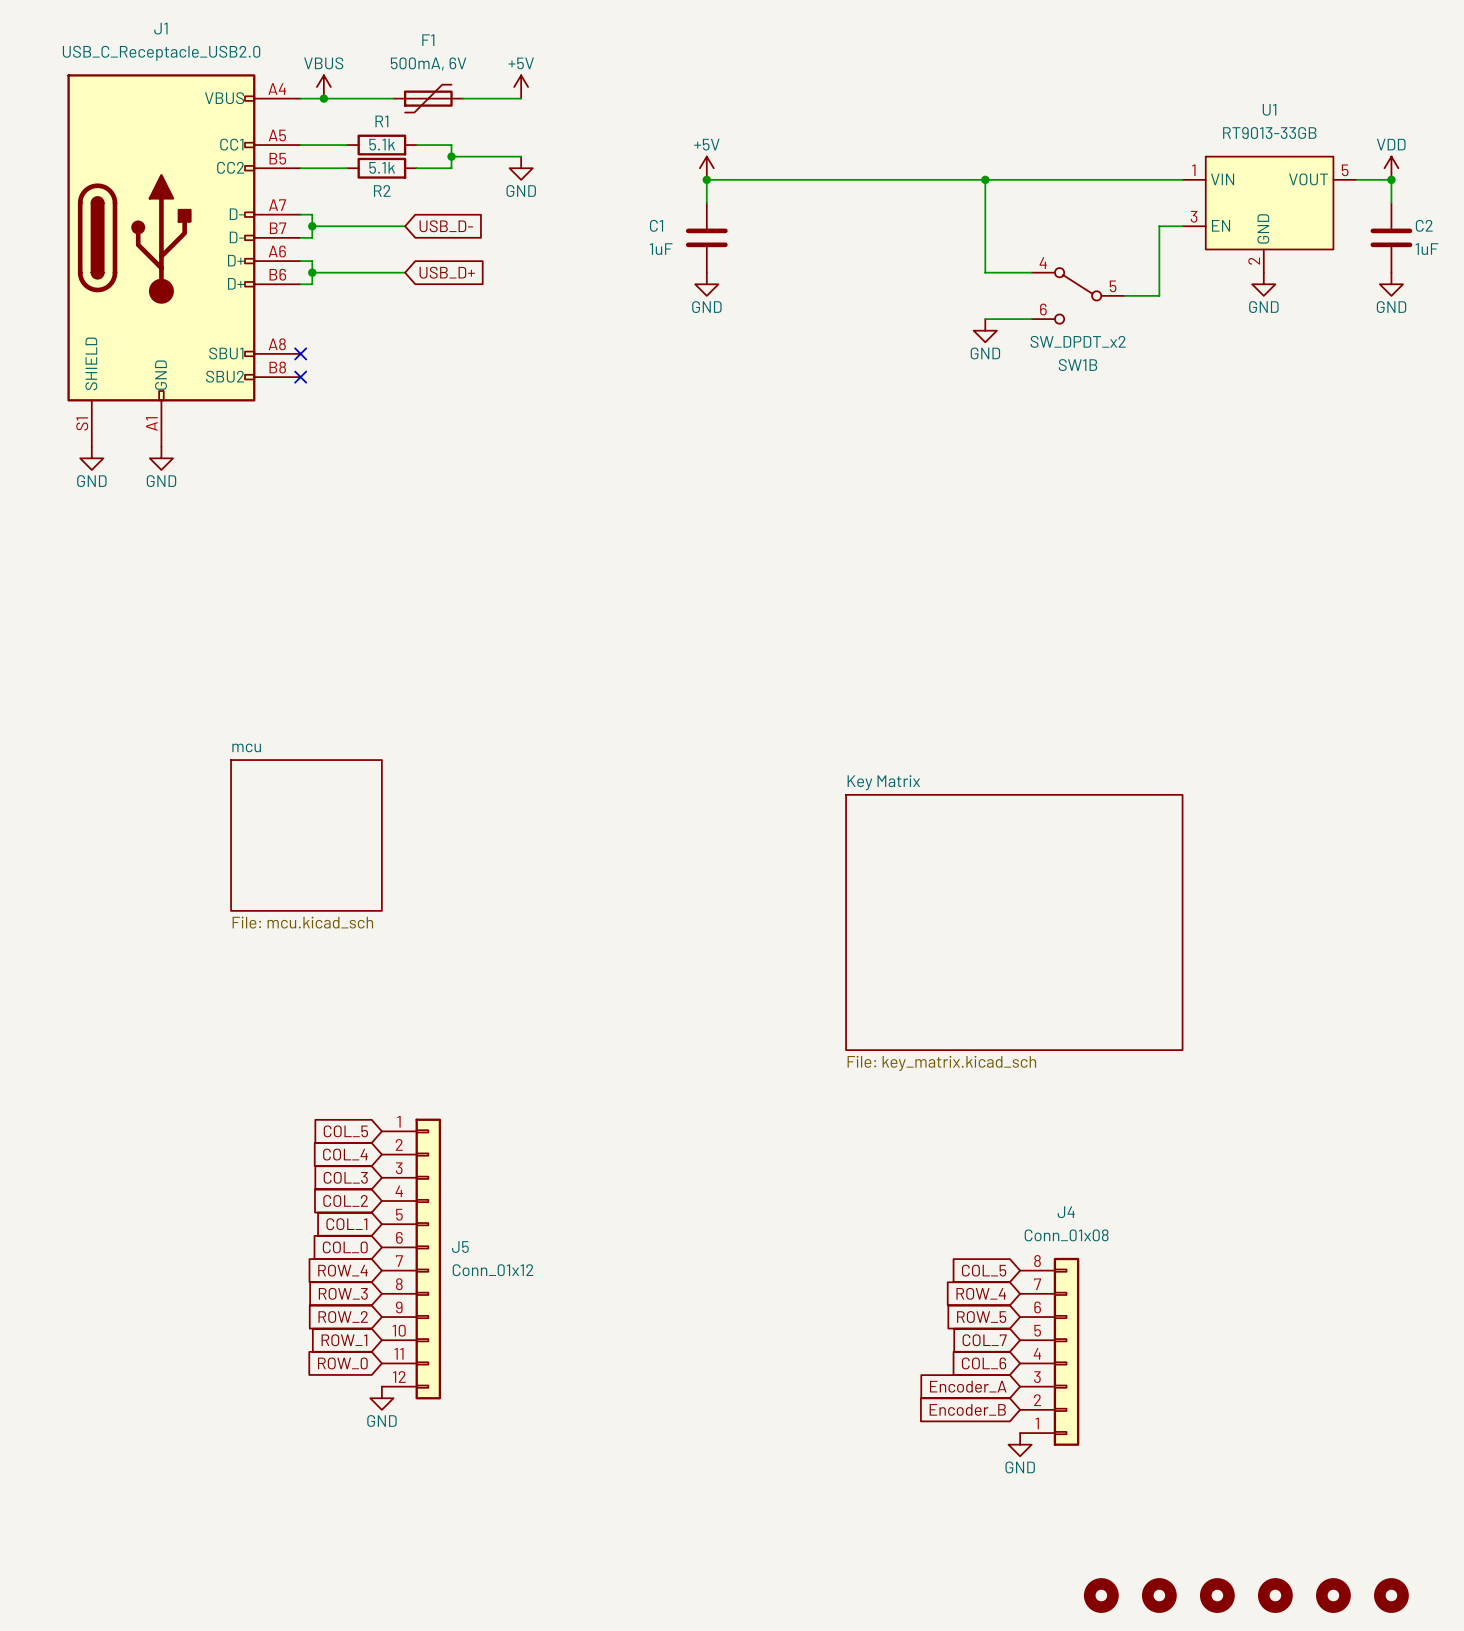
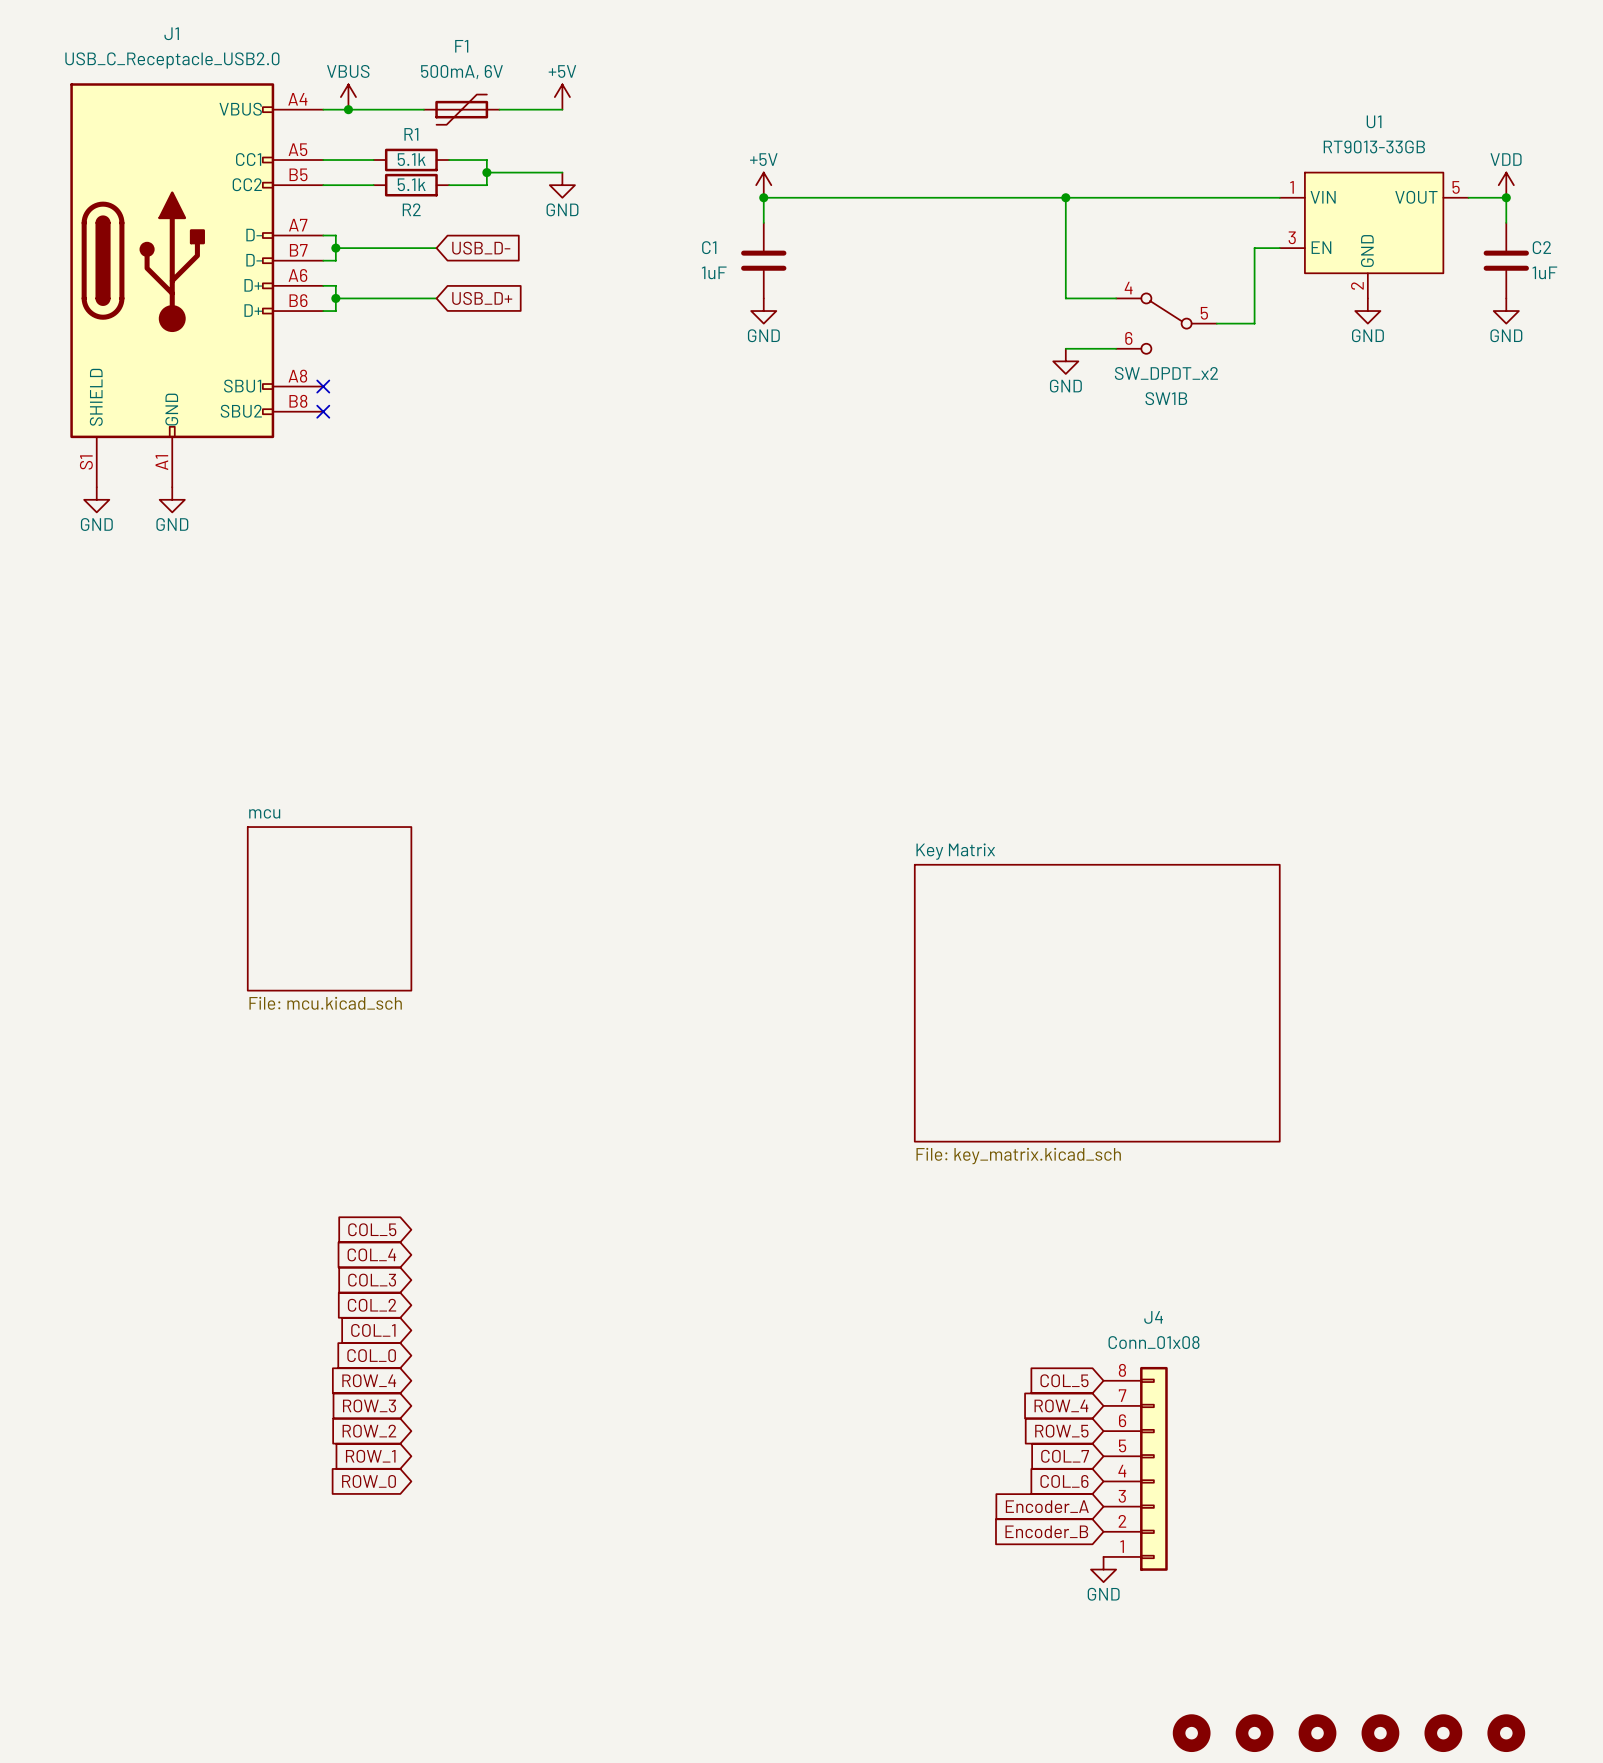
J5: Conn_01x12 (411, 1259) -> none
power symbol: GND (381, 1398) -> none

